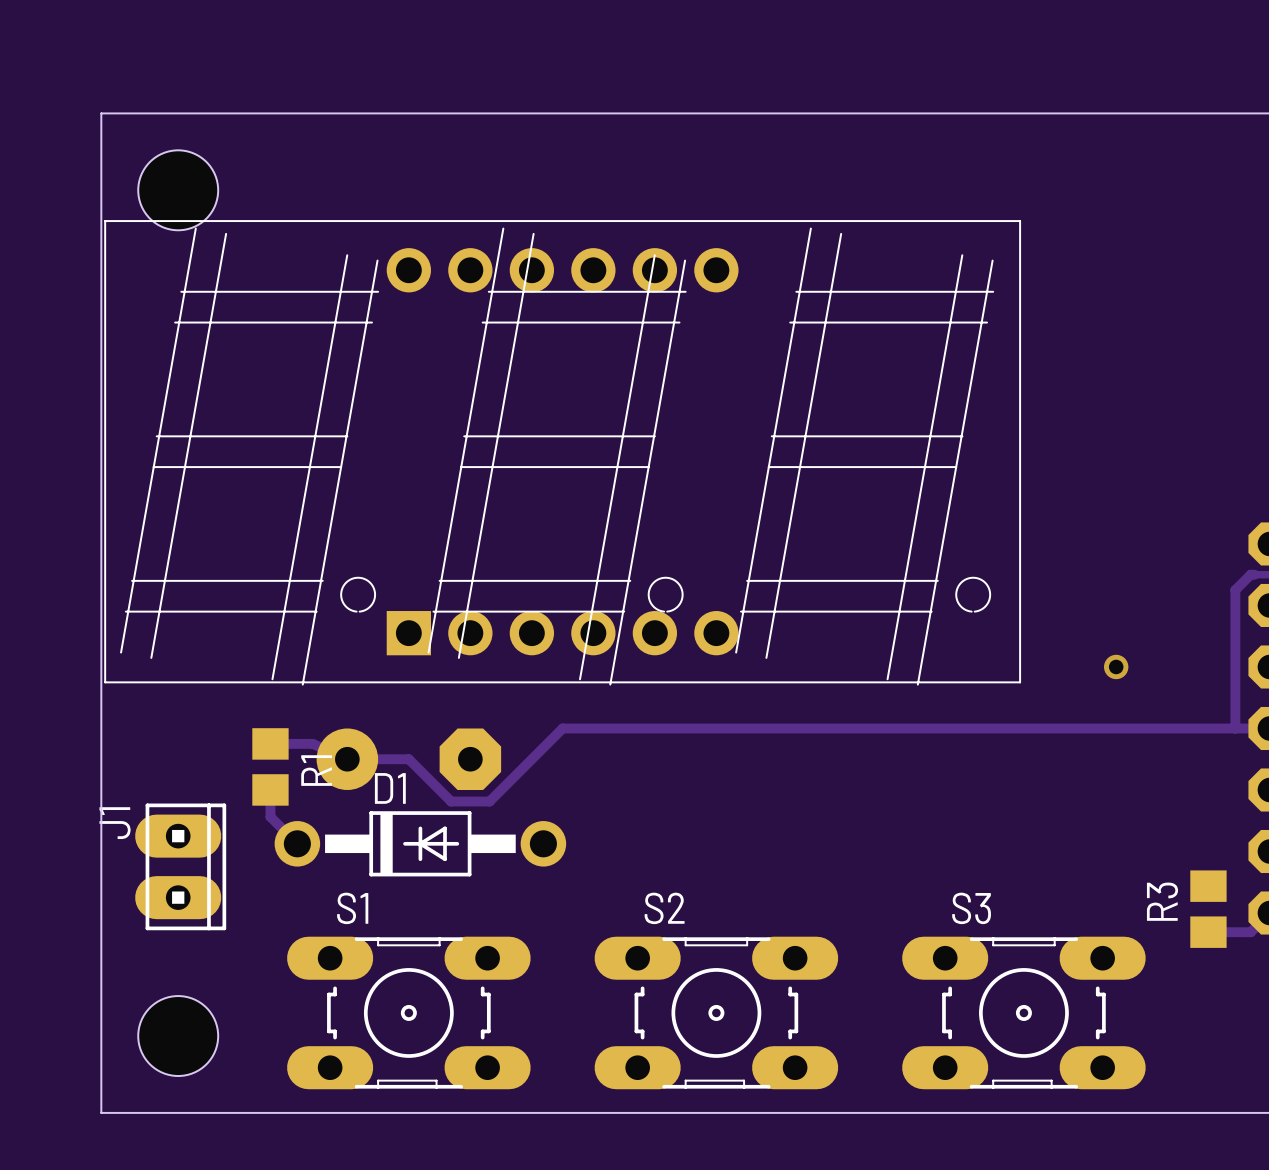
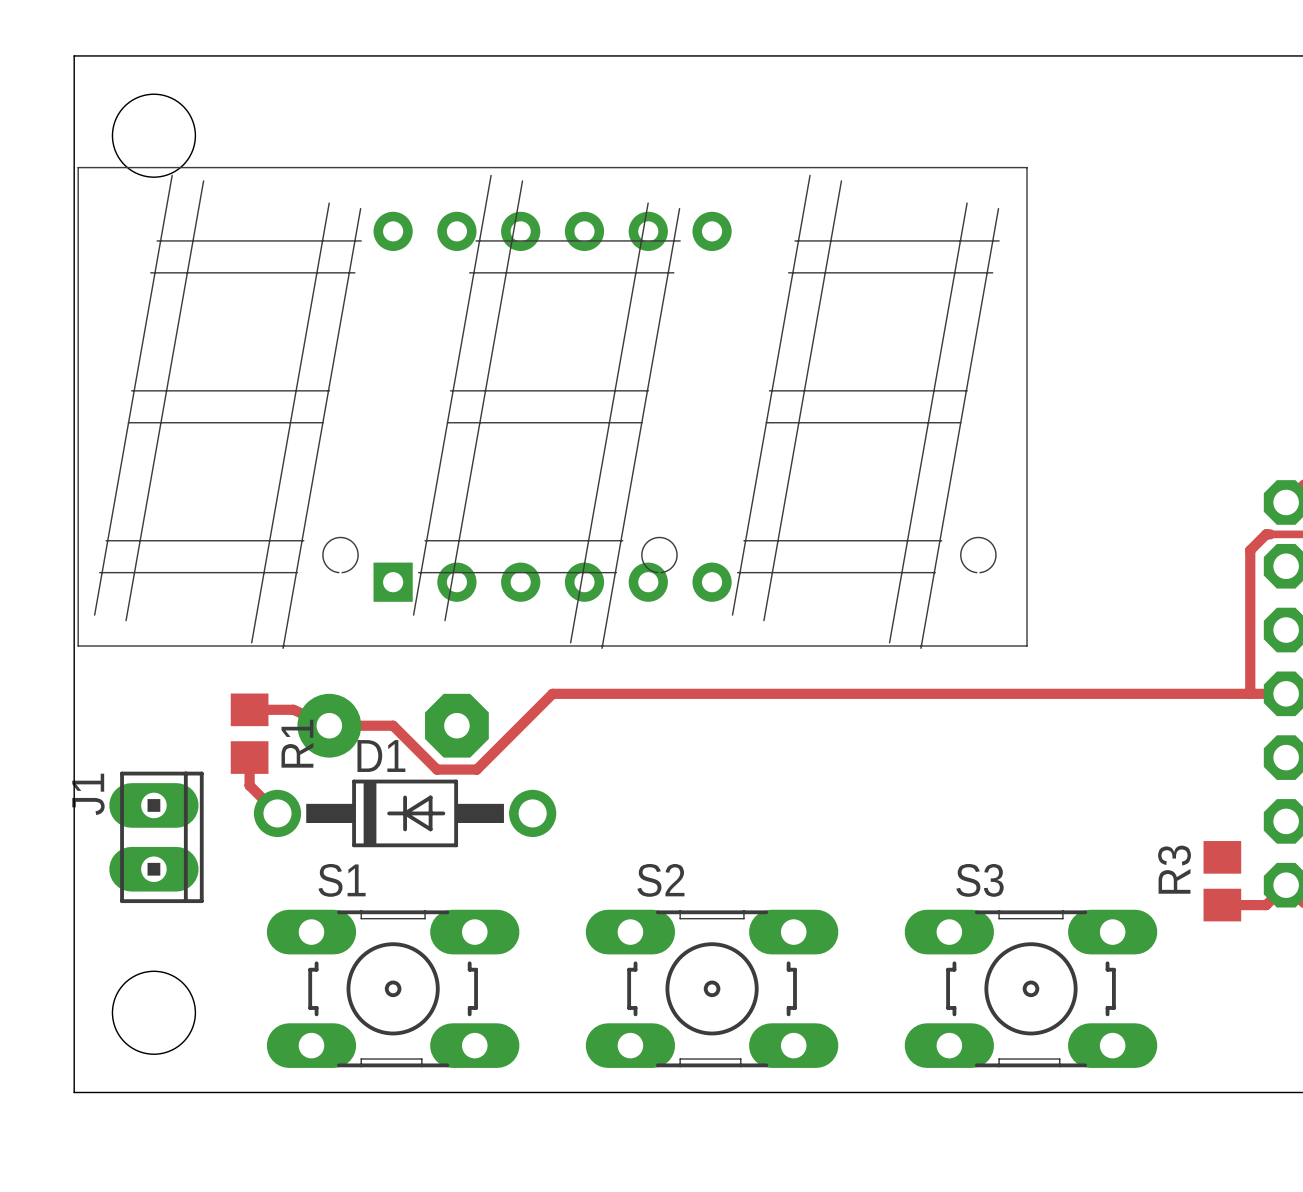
part footprint: [105, 221, 1021, 685] -> [78, 167, 1028, 649]
via: (1116, 666) -> none

